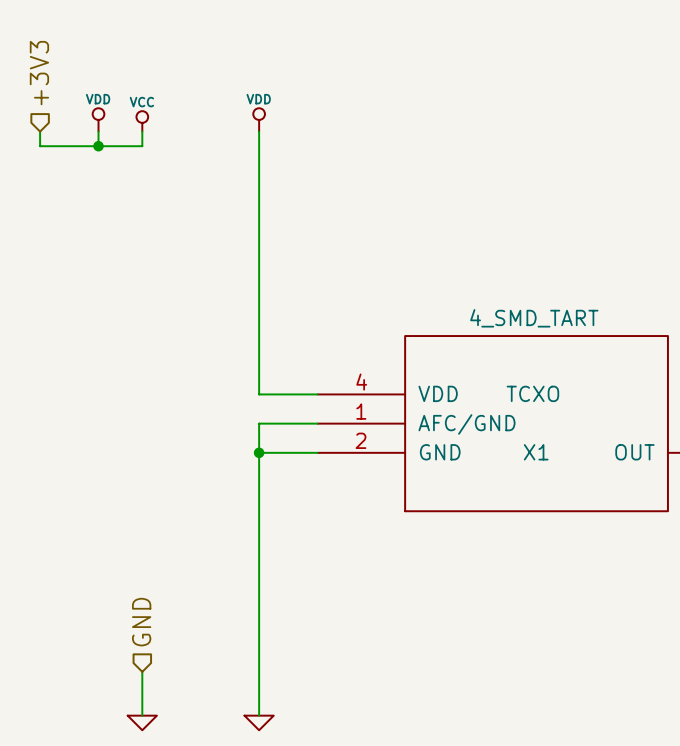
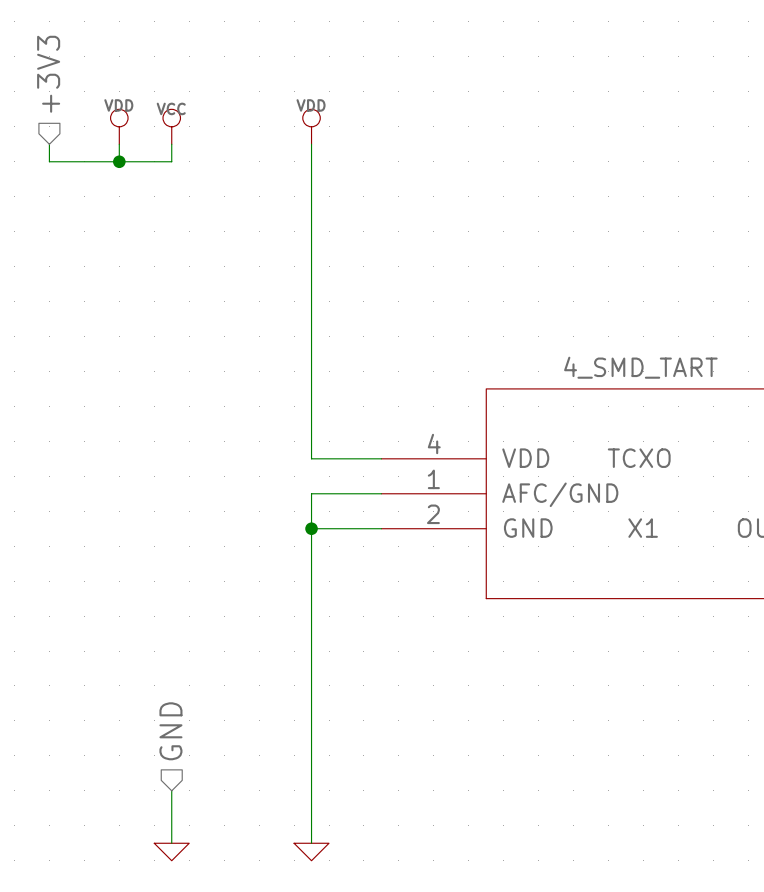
power symbol shape: [92, 108, 105, 132] -> [110, 109, 129, 145]
power symbol shape: [253, 108, 265, 132] -> [302, 109, 321, 145]
power symbol shape: [136, 111, 149, 132] -> [163, 109, 181, 145]

